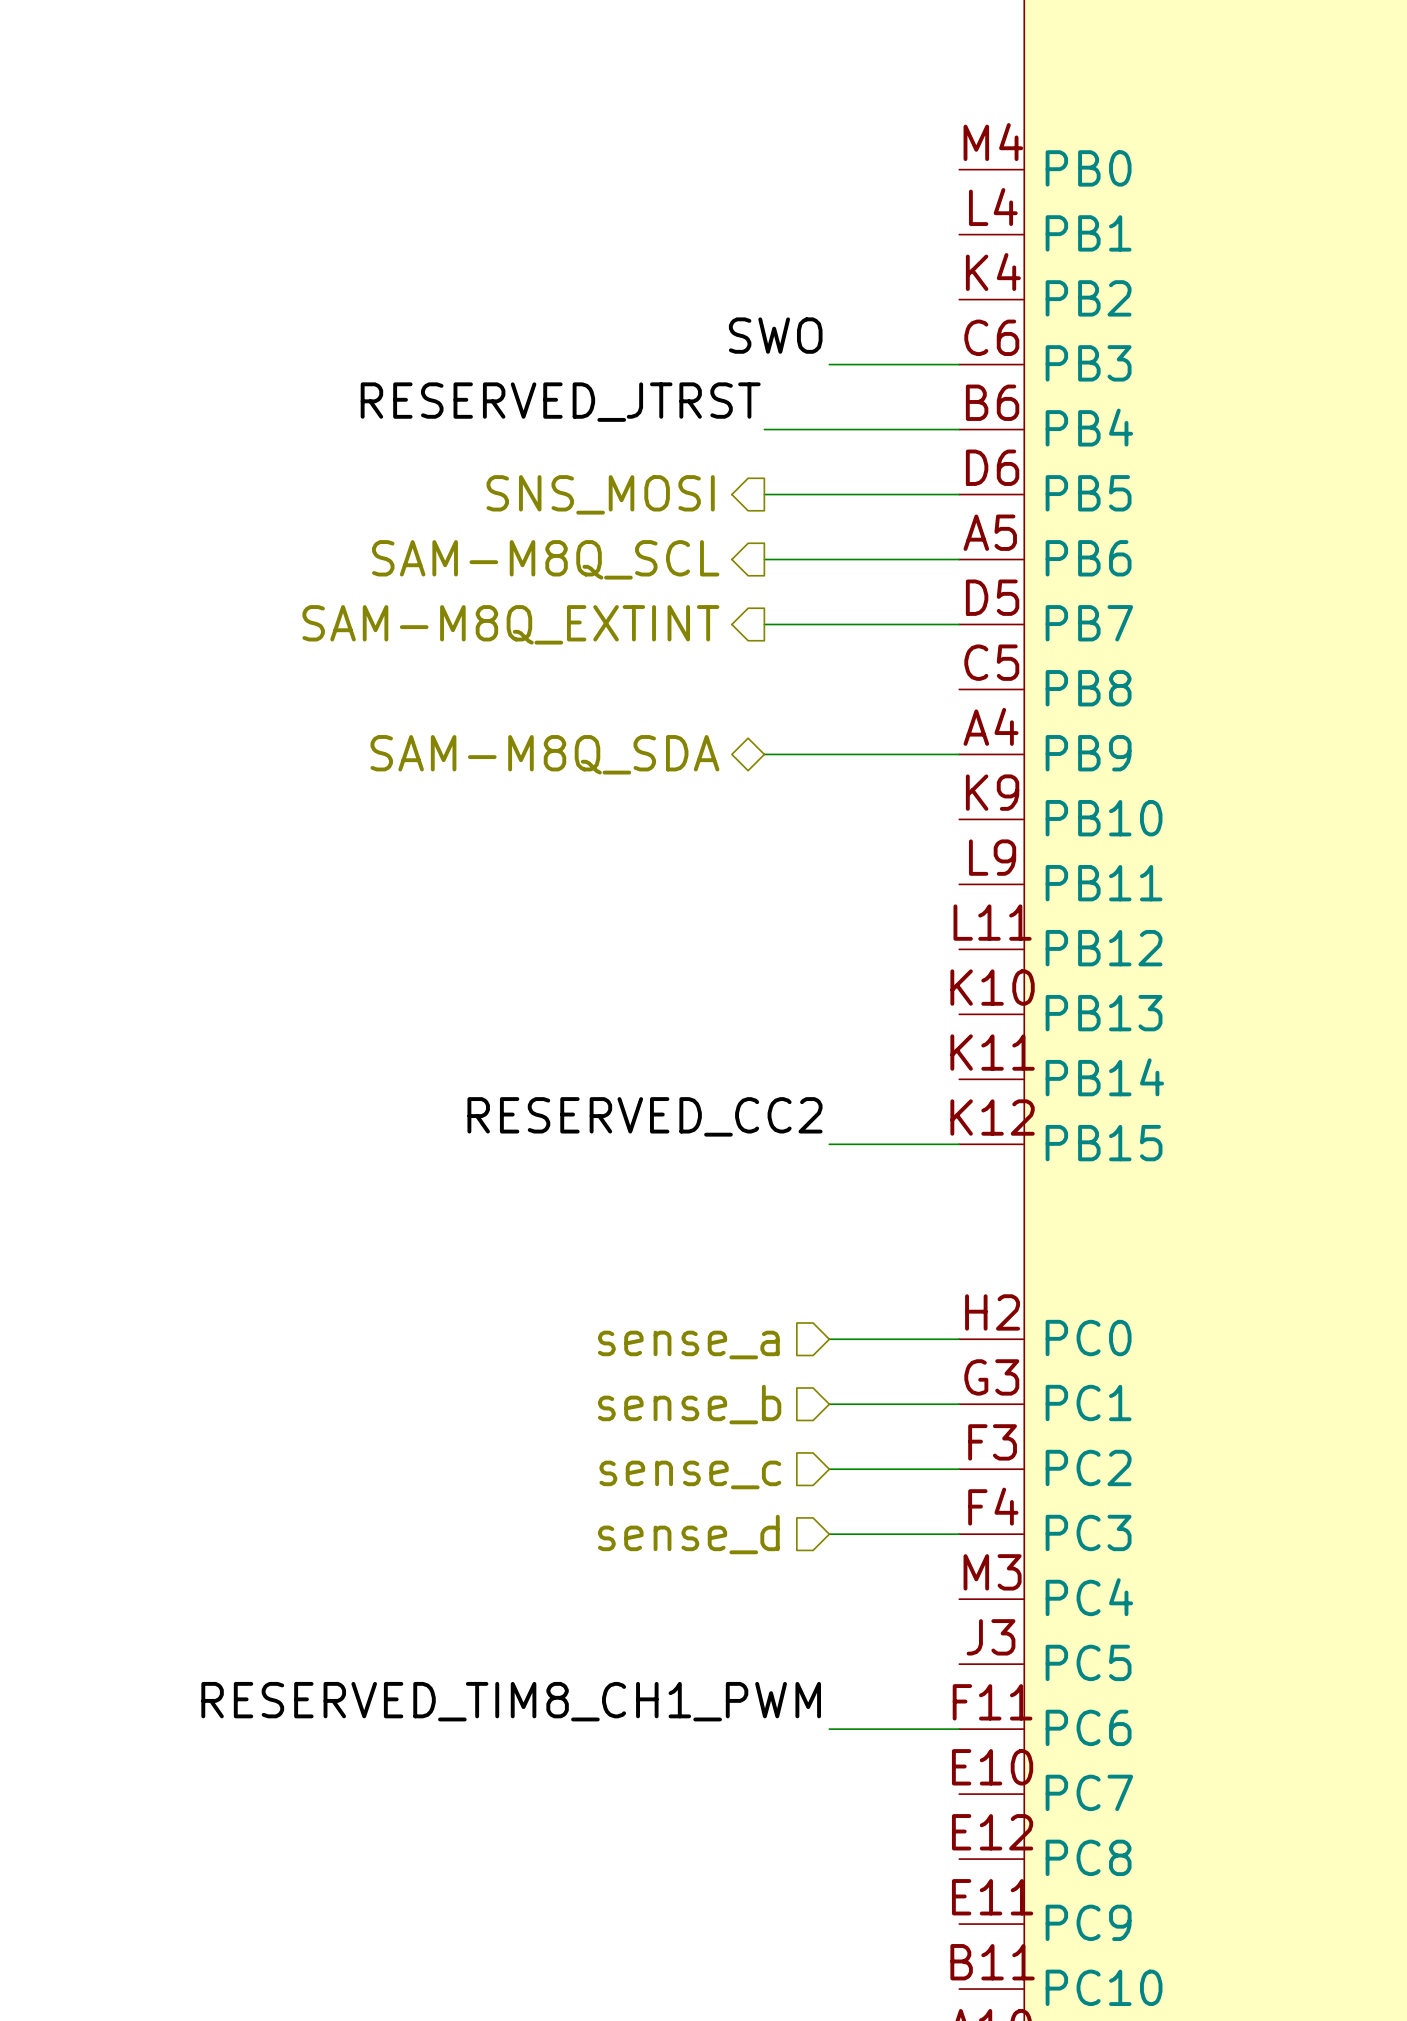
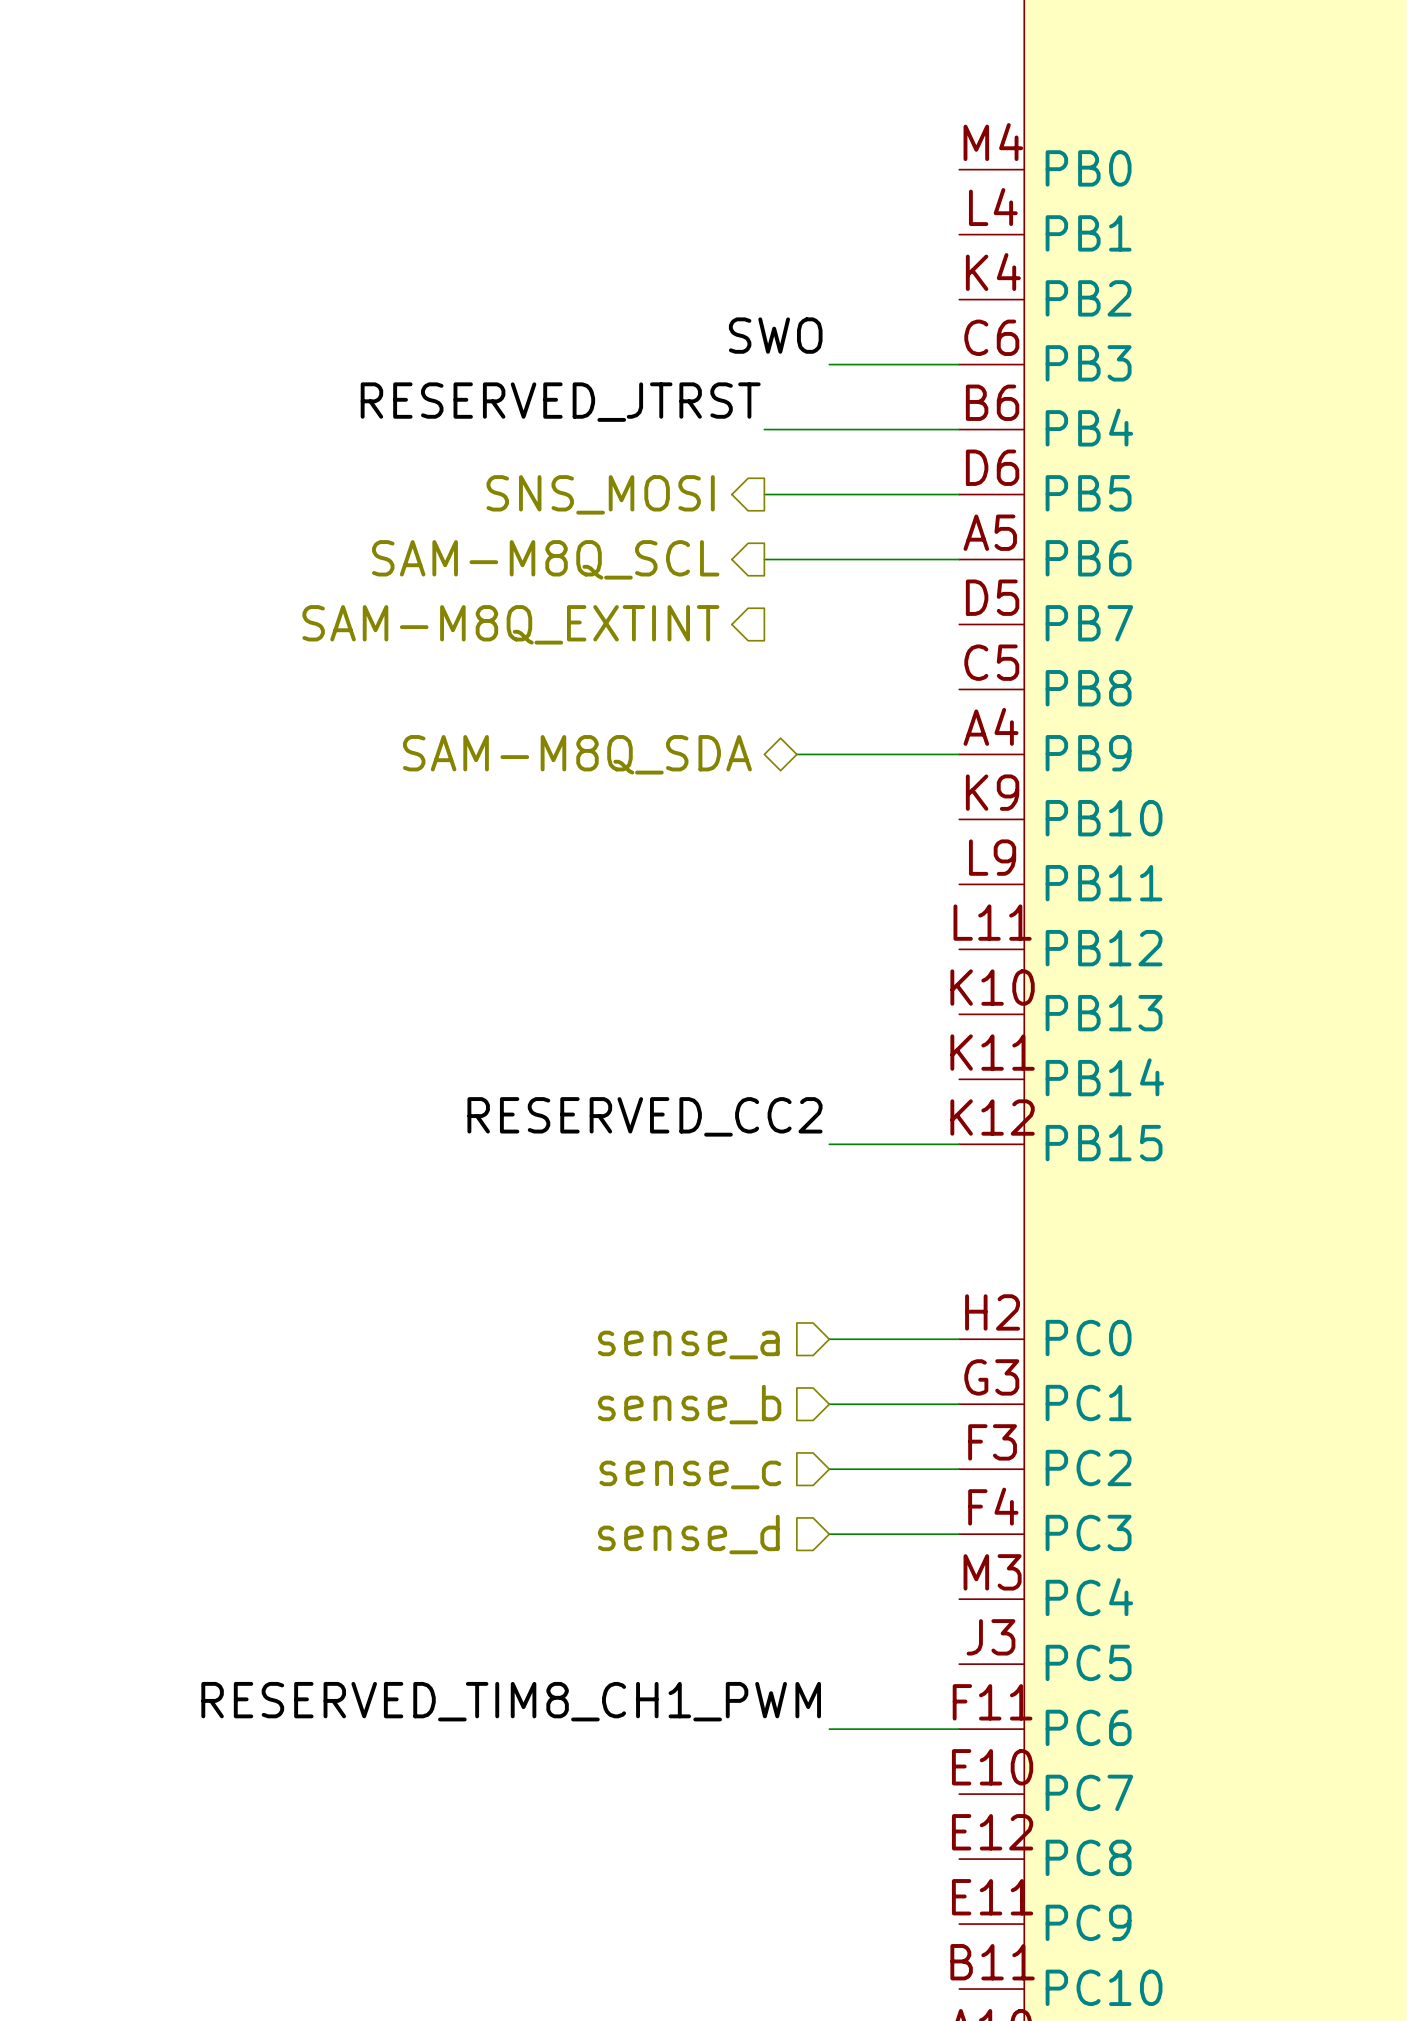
wire: (764, 624) (959, 624) -> none
hierarchical label position: SAM-M8Q_SDA (544, 754) -> SAM-M8Q_SDA (577, 754)
wire: (764, 754) (796, 754) -> none

